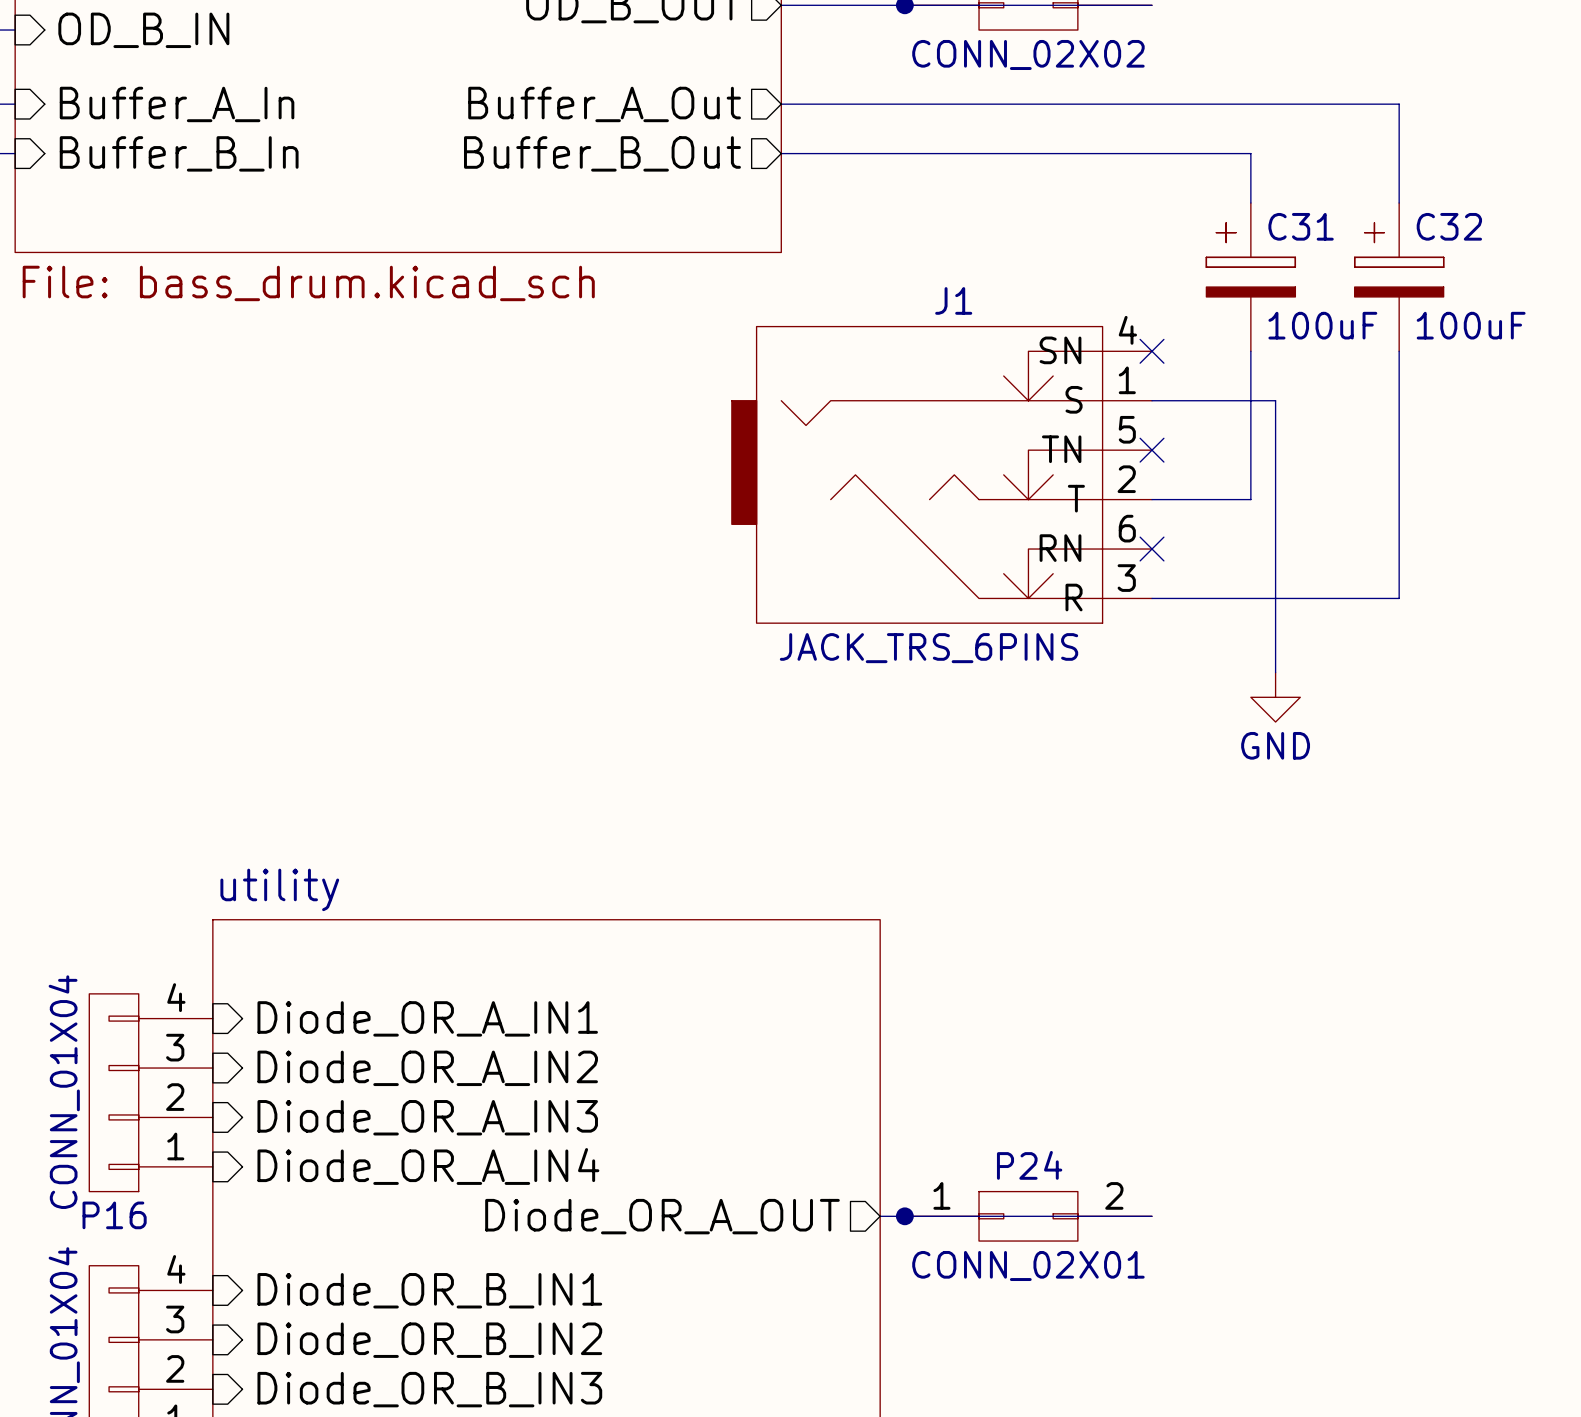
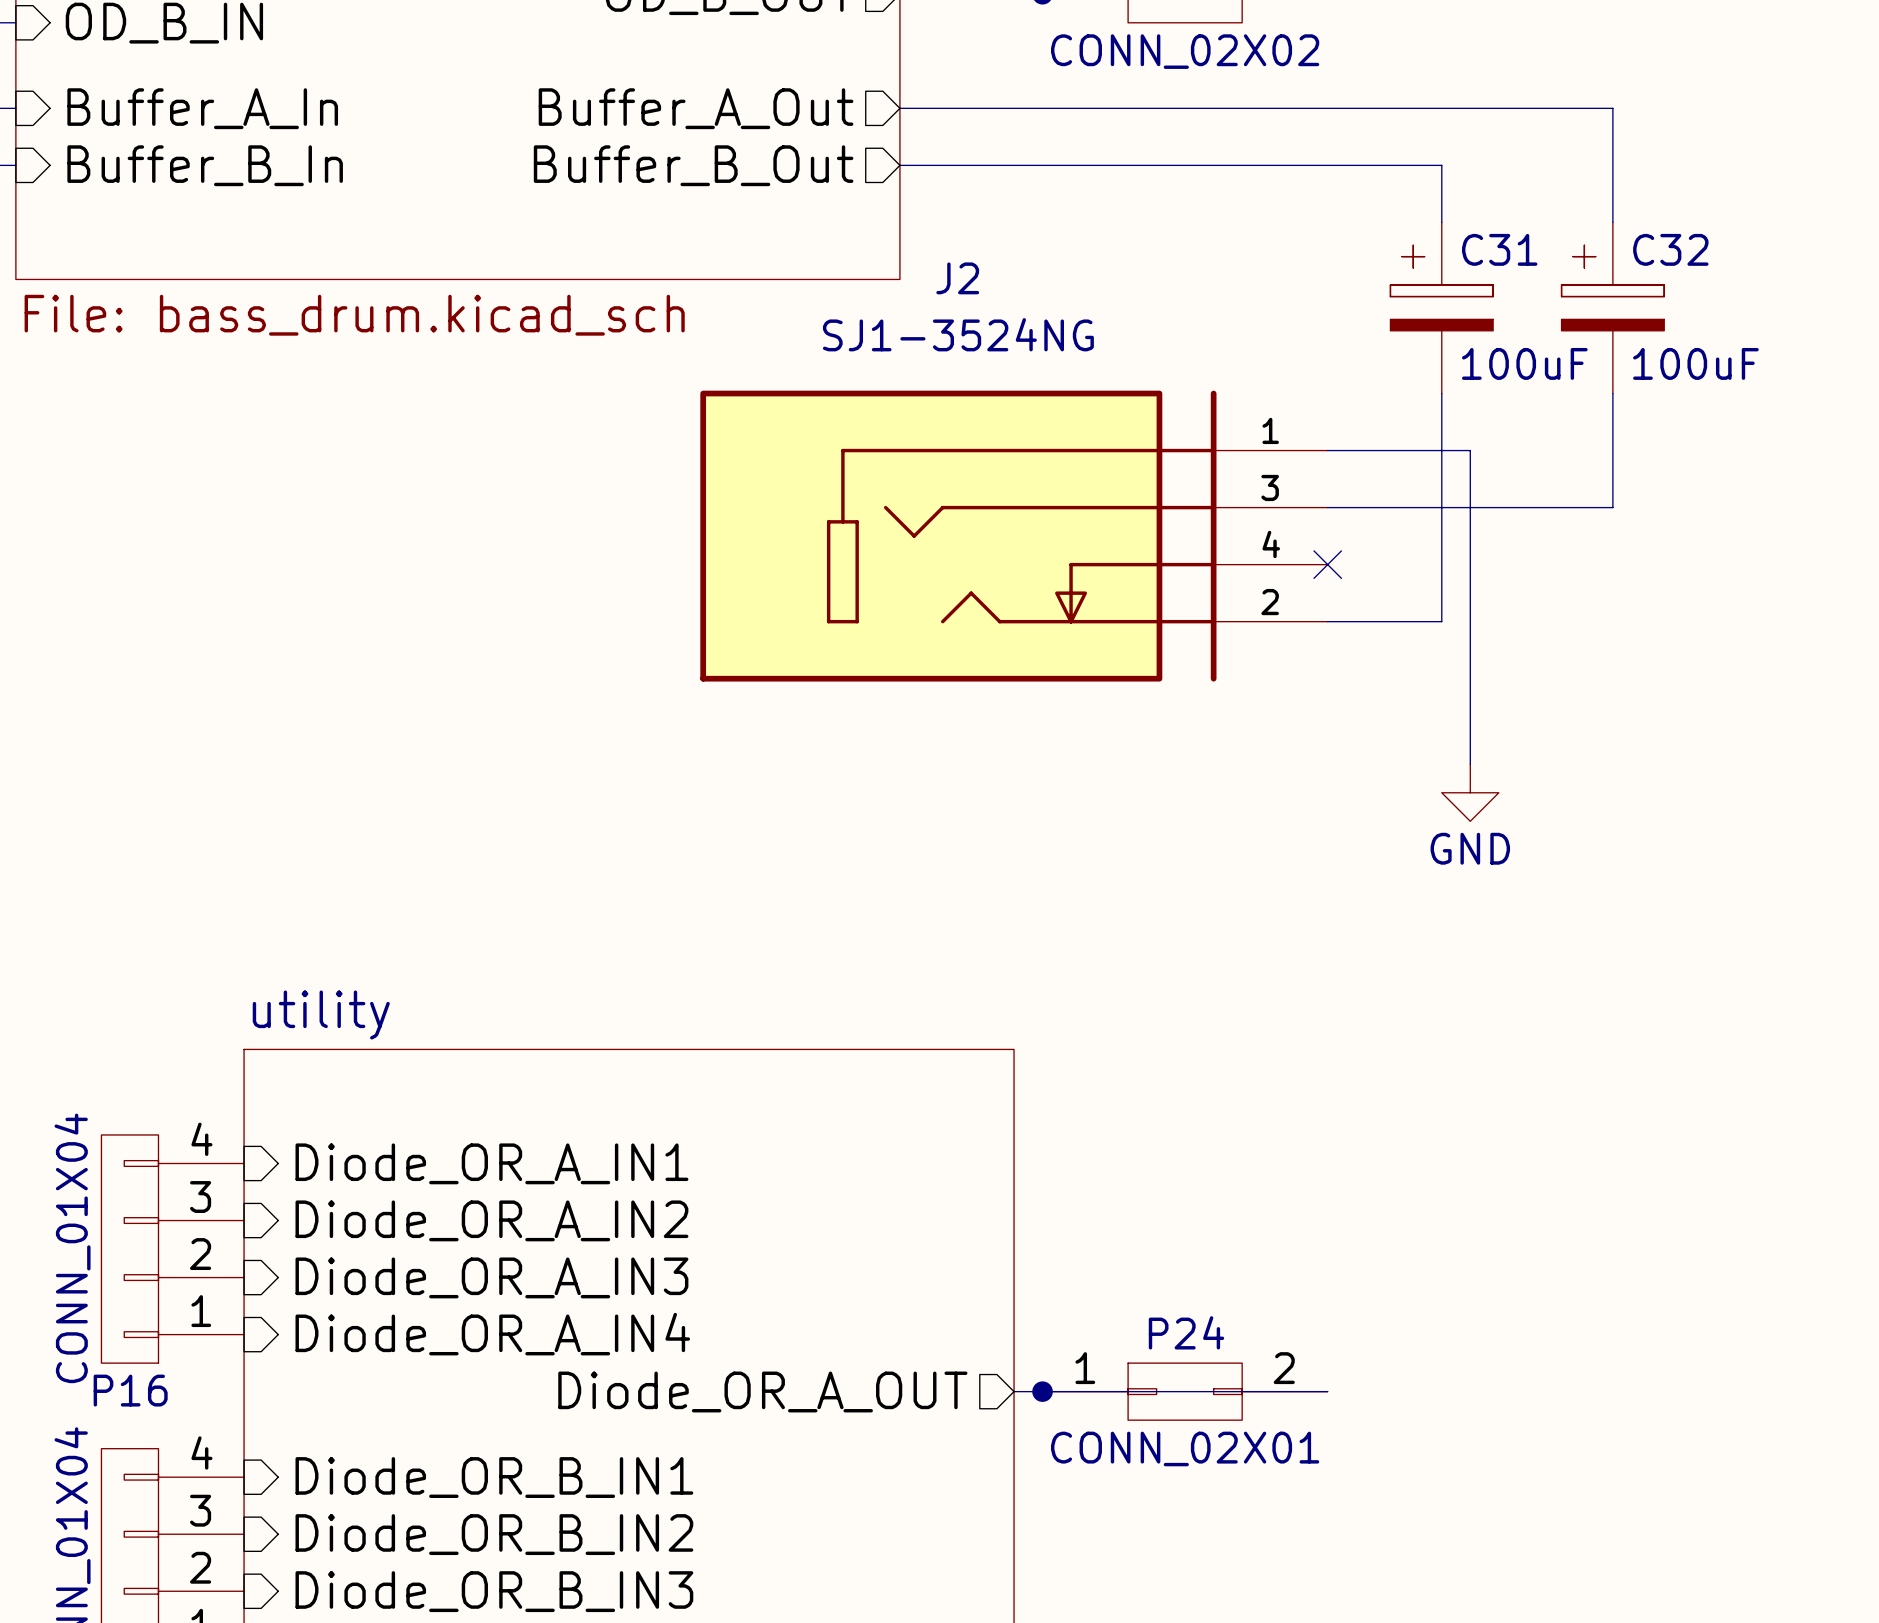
no-connect mark: (1152, 351) -> none
no-connect mark: (1152, 450) -> none
wire: (1399, 450) (1399, 598) (1152, 598) -> (1612, 507) (1327, 507)
J2: none -> SJ1-3524NG (1014, 536)
J1: JACK_TRS_6PINS (941, 474) -> none
wire: (1152, 499) (1250, 499) -> (1327, 621) (1441, 621) (1441, 564)
no-connect mark: none -> (1327, 564)
no-connect mark: (1152, 549) -> none

